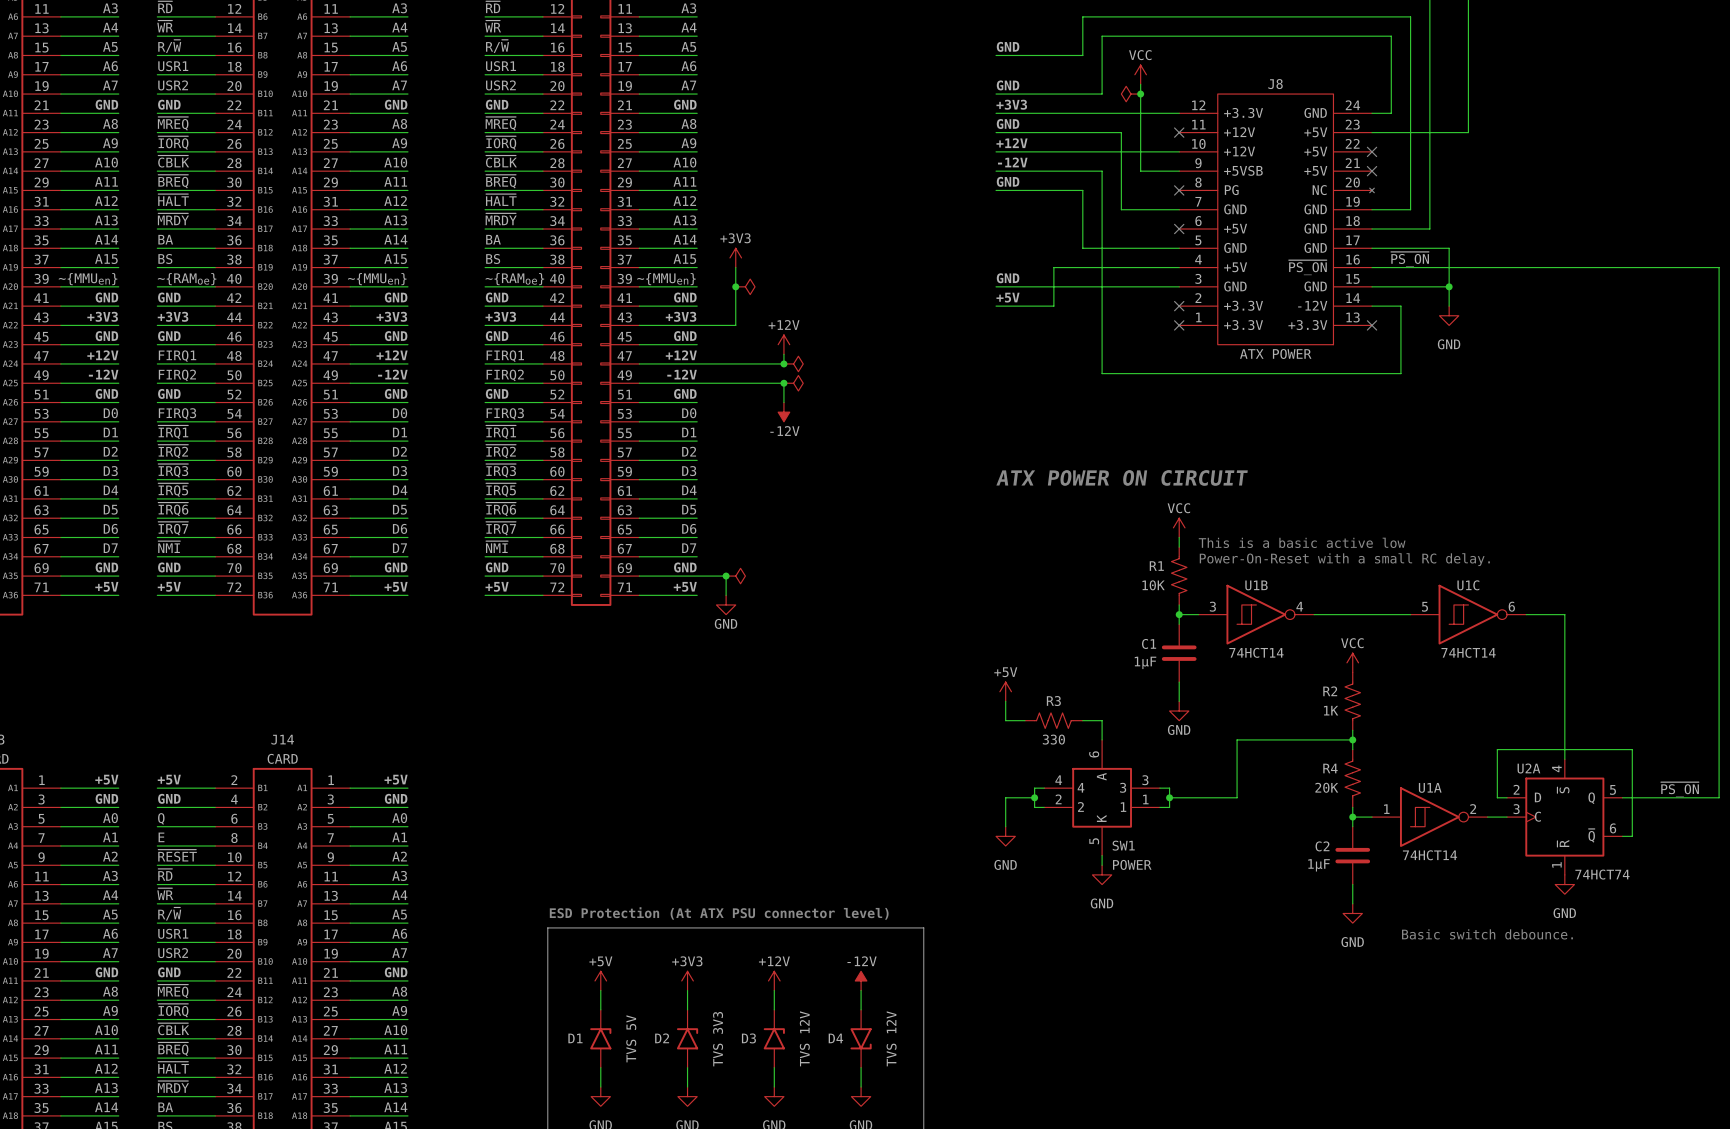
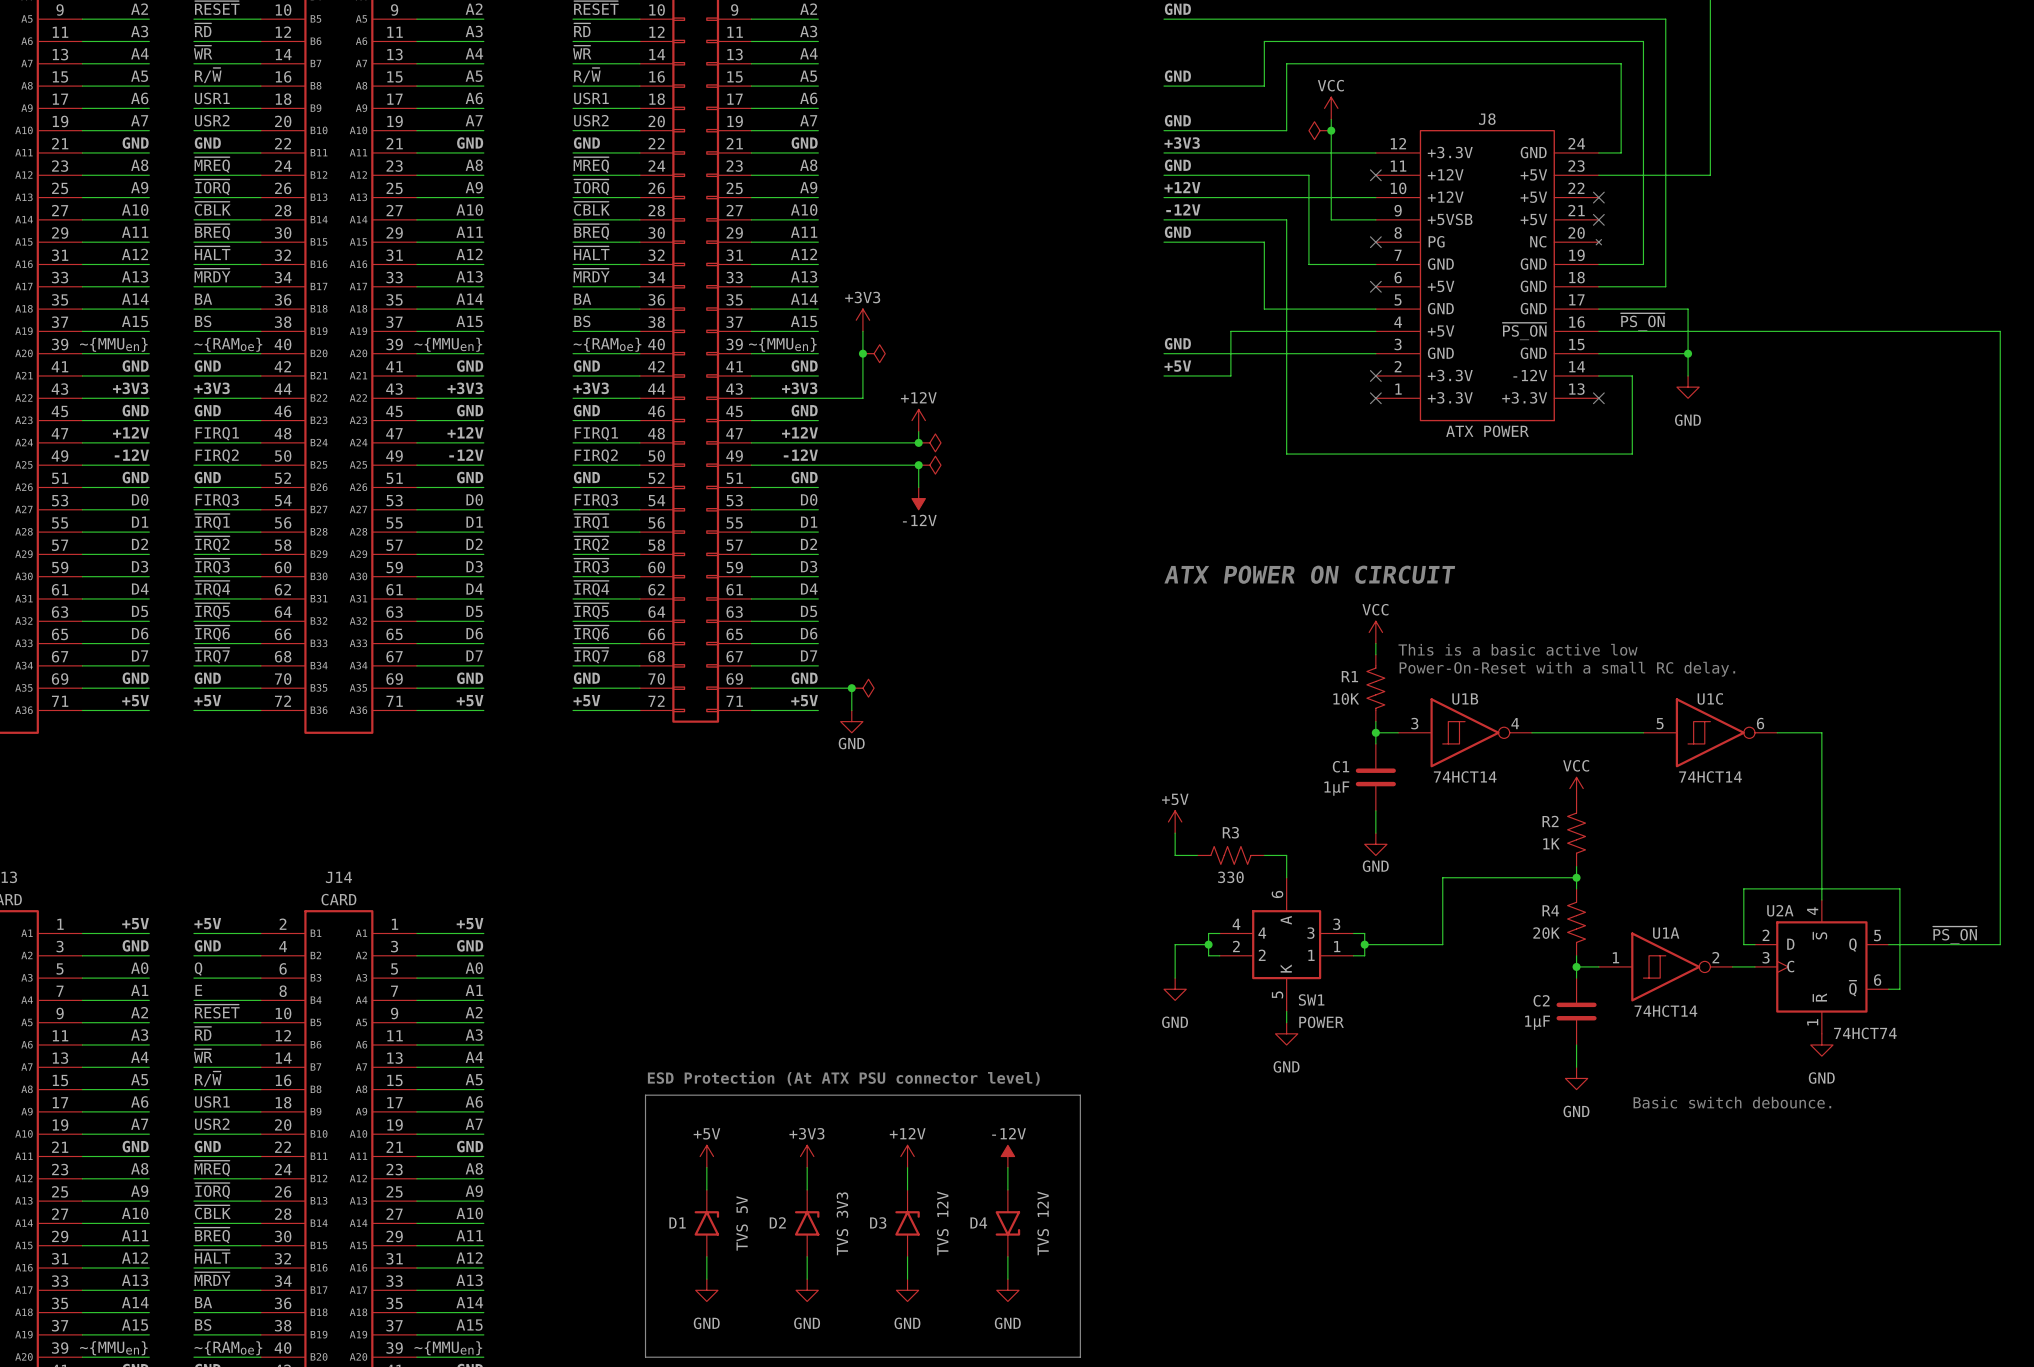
label: ~{IRQ5} (173, 490) -> ~{IRQ4} (212, 588)
label: ~{IRQ5} (501, 490) -> ~{IRQ4} (591, 588)
label: ~{IRQ6} (173, 509) -> ~{IRQ5} (212, 611)
label: ~{IRQ6} (501, 509) -> ~{IRQ5} (591, 611)
label: ~{IRQ7} (173, 528) -> ~{IRQ6} (212, 633)
label: ~{IRQ7} (501, 528) -> ~{IRQ6} (591, 633)
label: ~{NMI} (169, 547) -> ~{IRQ7} (212, 655)
label: ~{NMI} (497, 547) -> ~{IRQ7} (591, 655)

